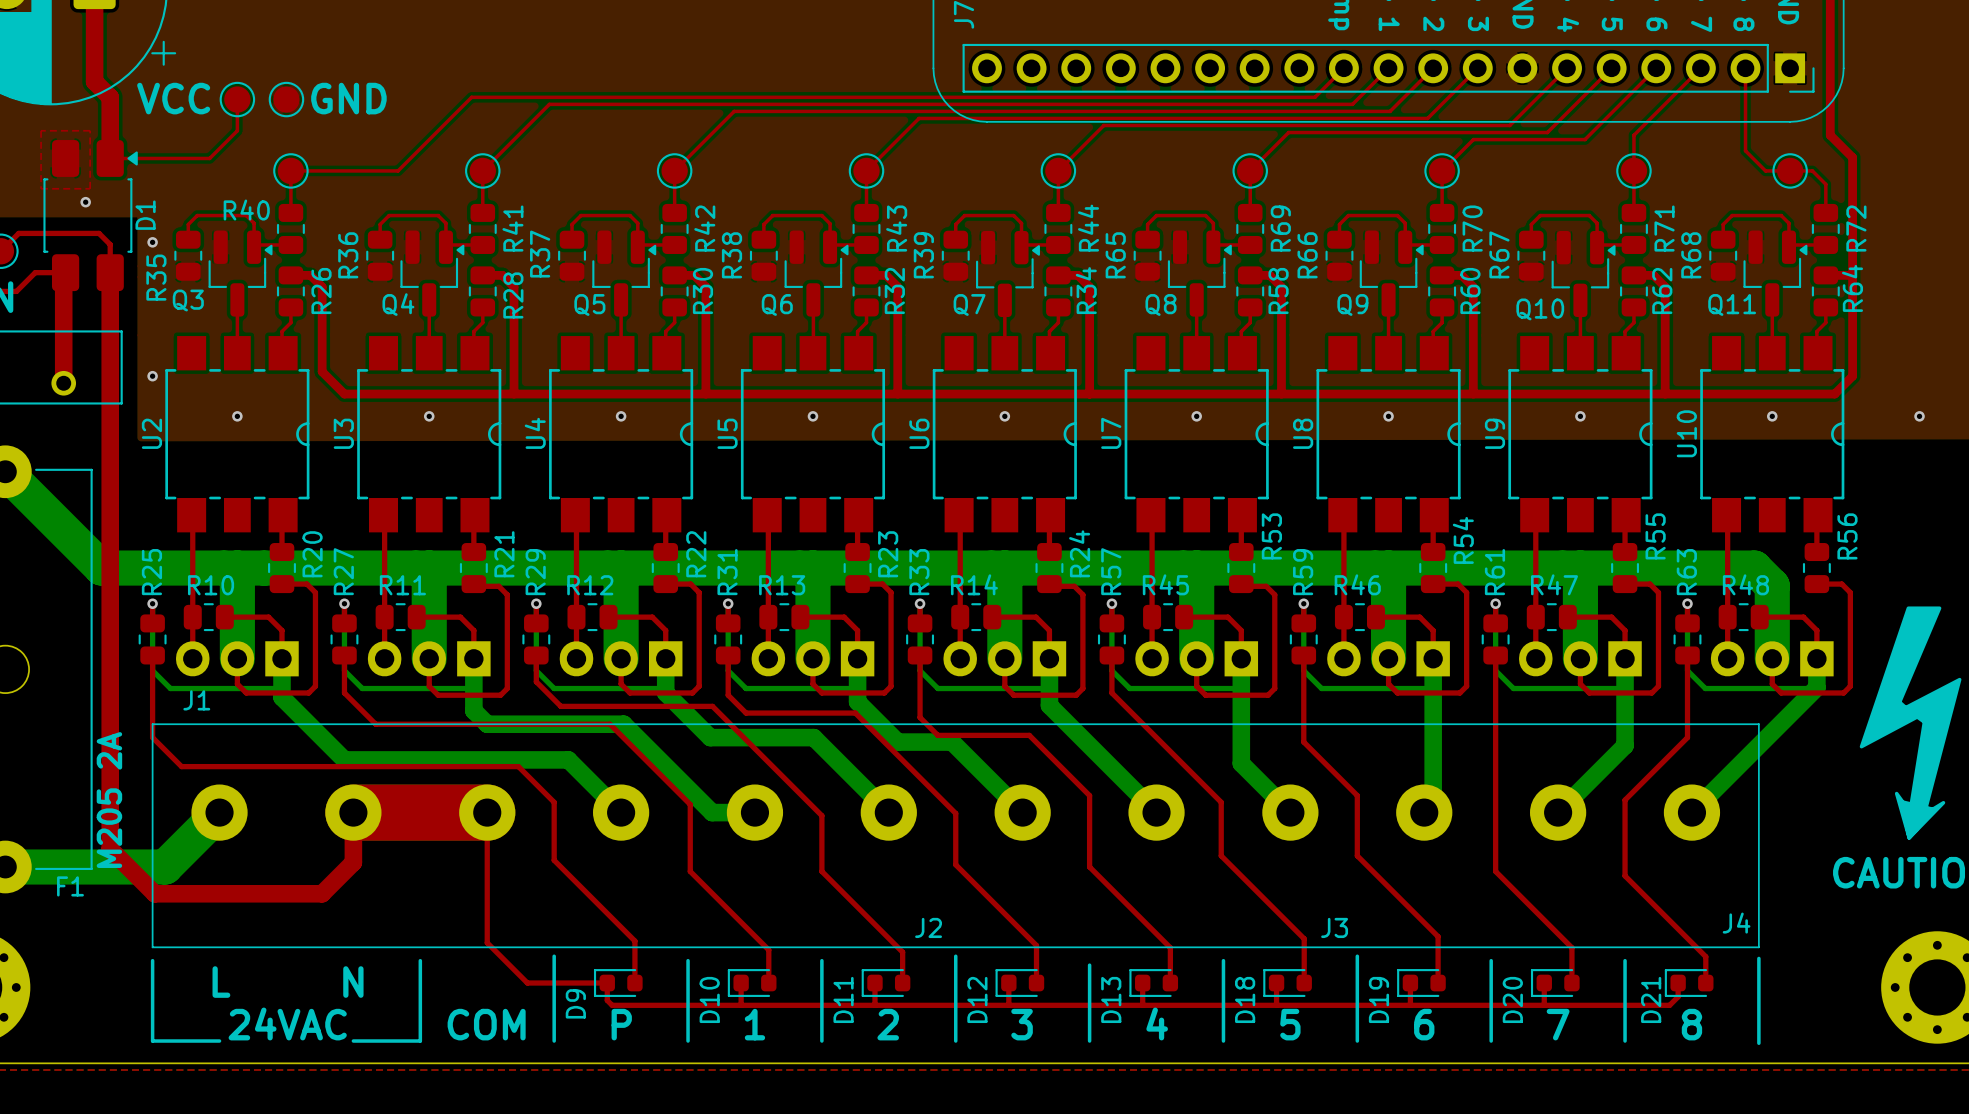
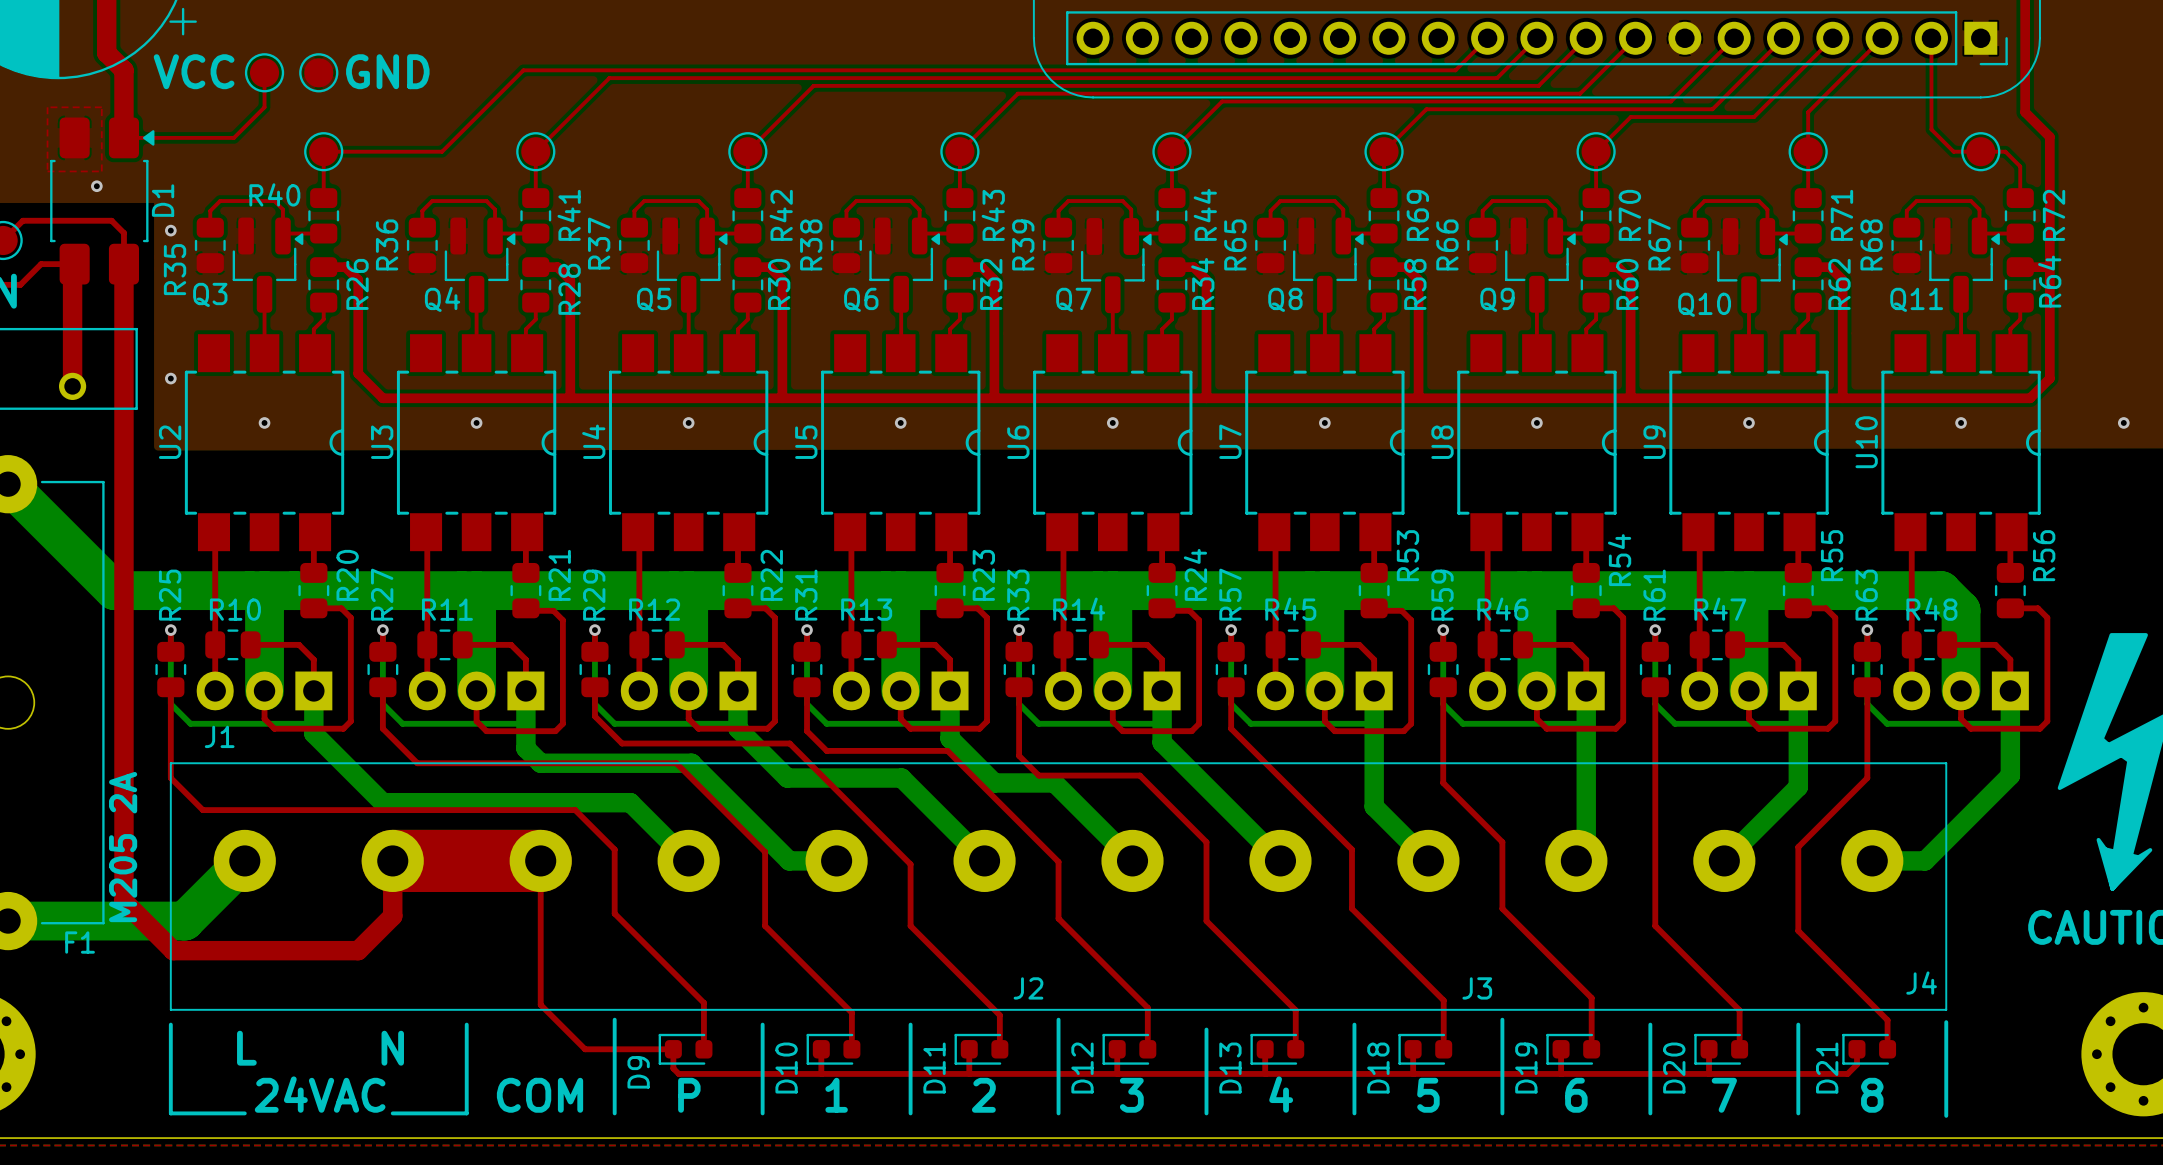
bottom track: (1816, 687) (1691, 812) -> (2010, 722) (2010, 775) (1925, 860) (1872, 860)

